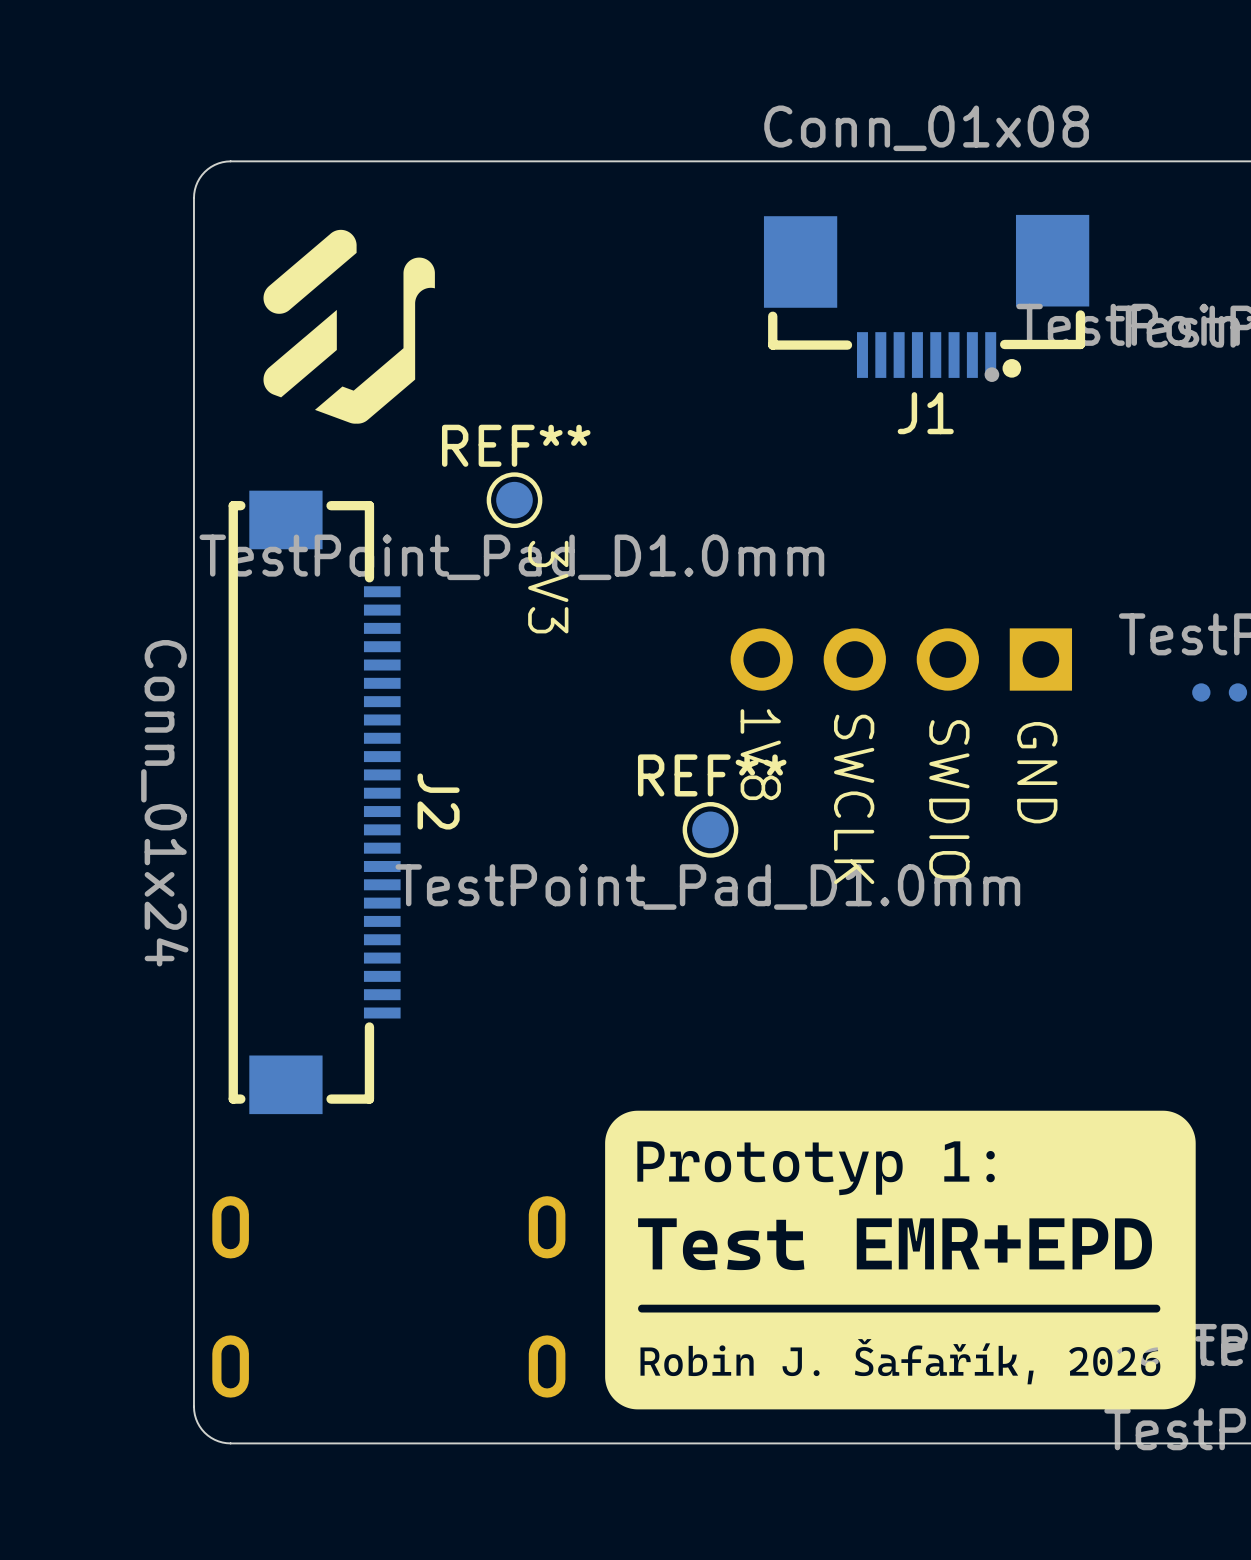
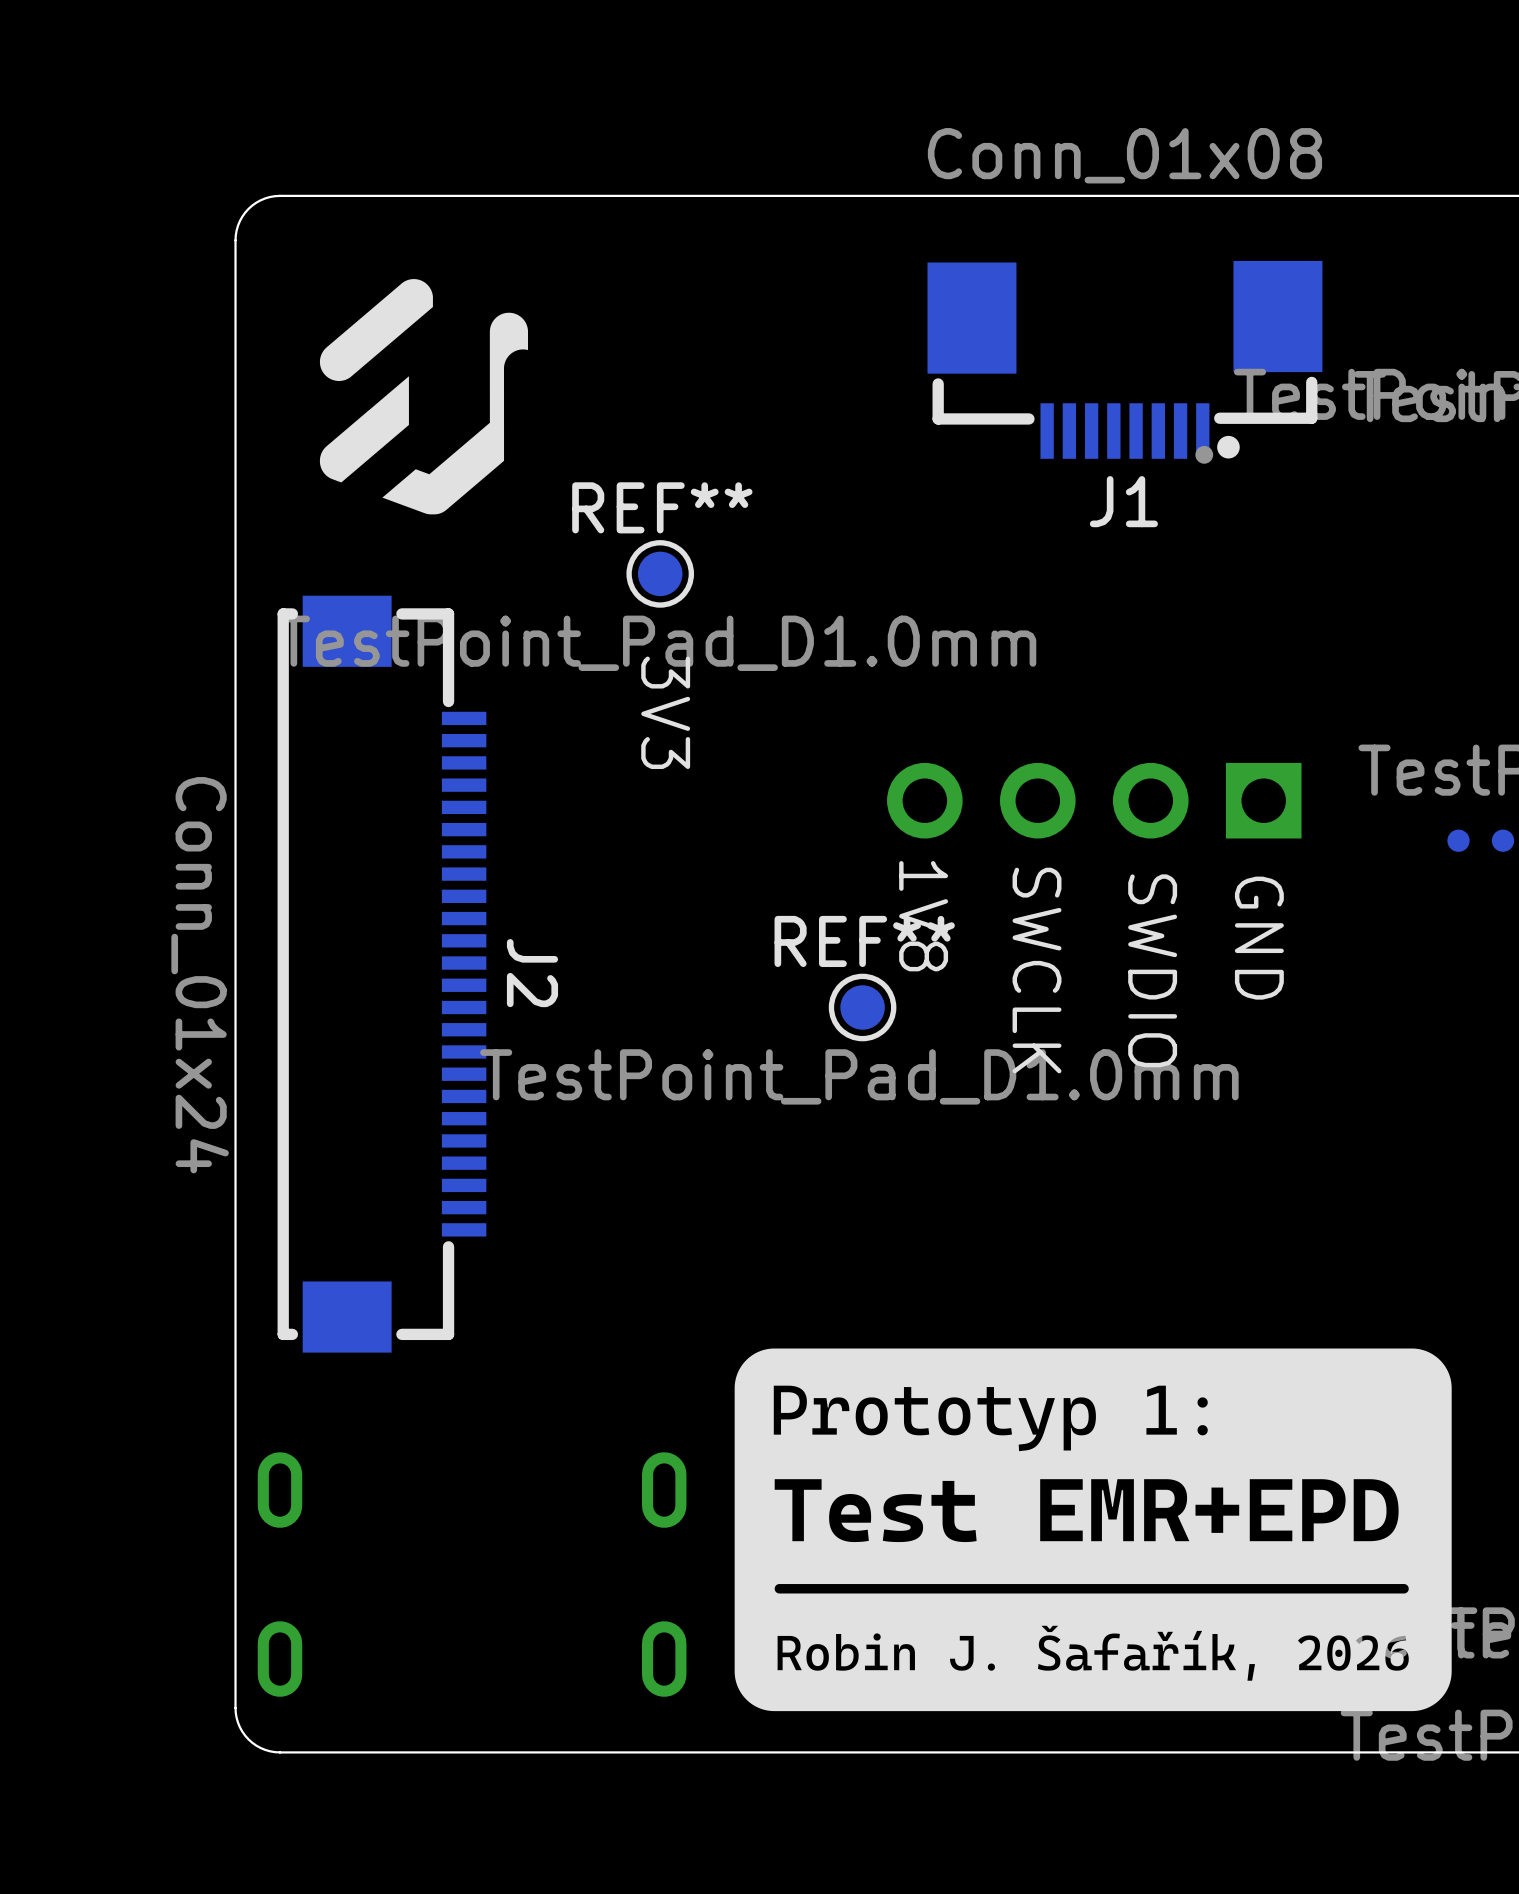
REF** position: (514, 500) -> (660, 573)

